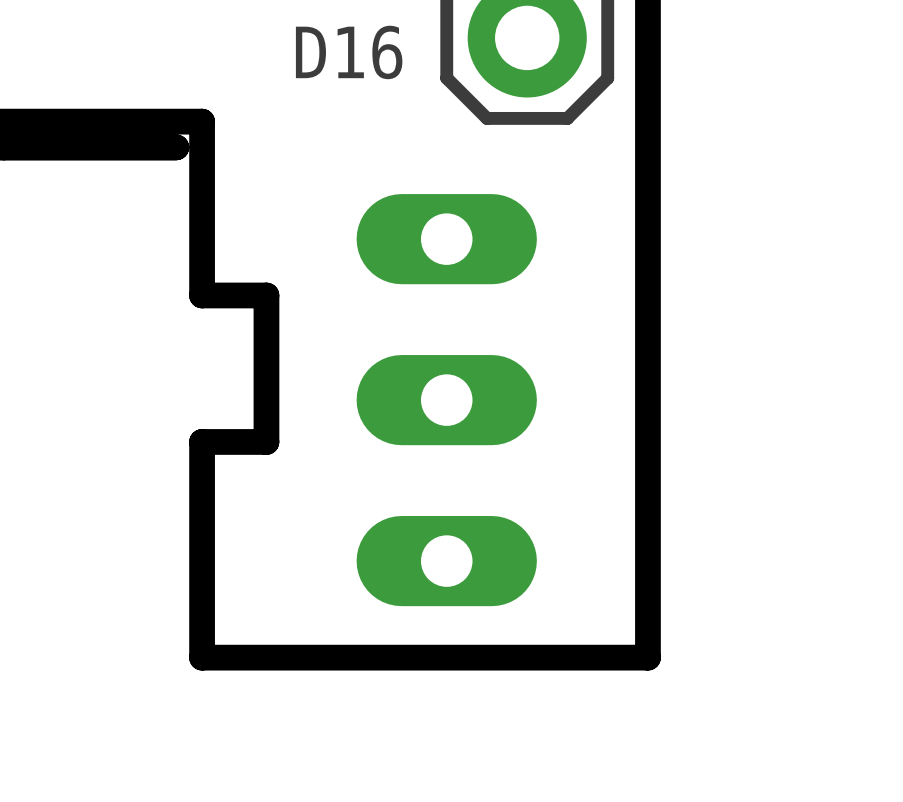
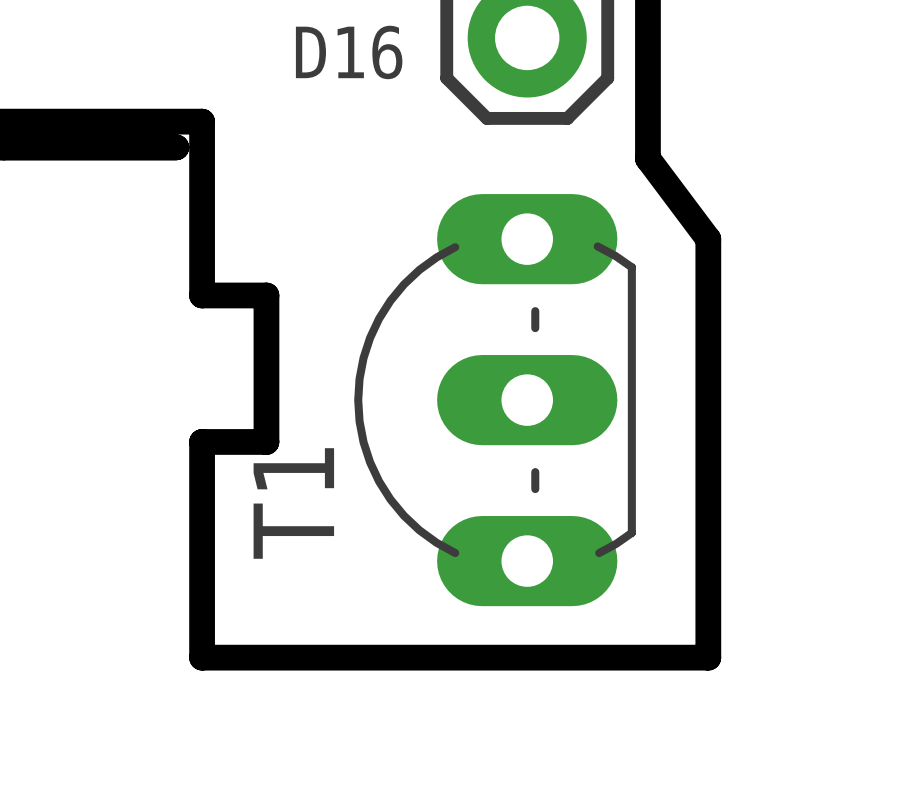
board edge: (647, 158) (647, 657) -> (647, 158) (708, 239) (708, 657) (647, 657)
T1 side: bottom (446, 400) -> top (495, 400)

